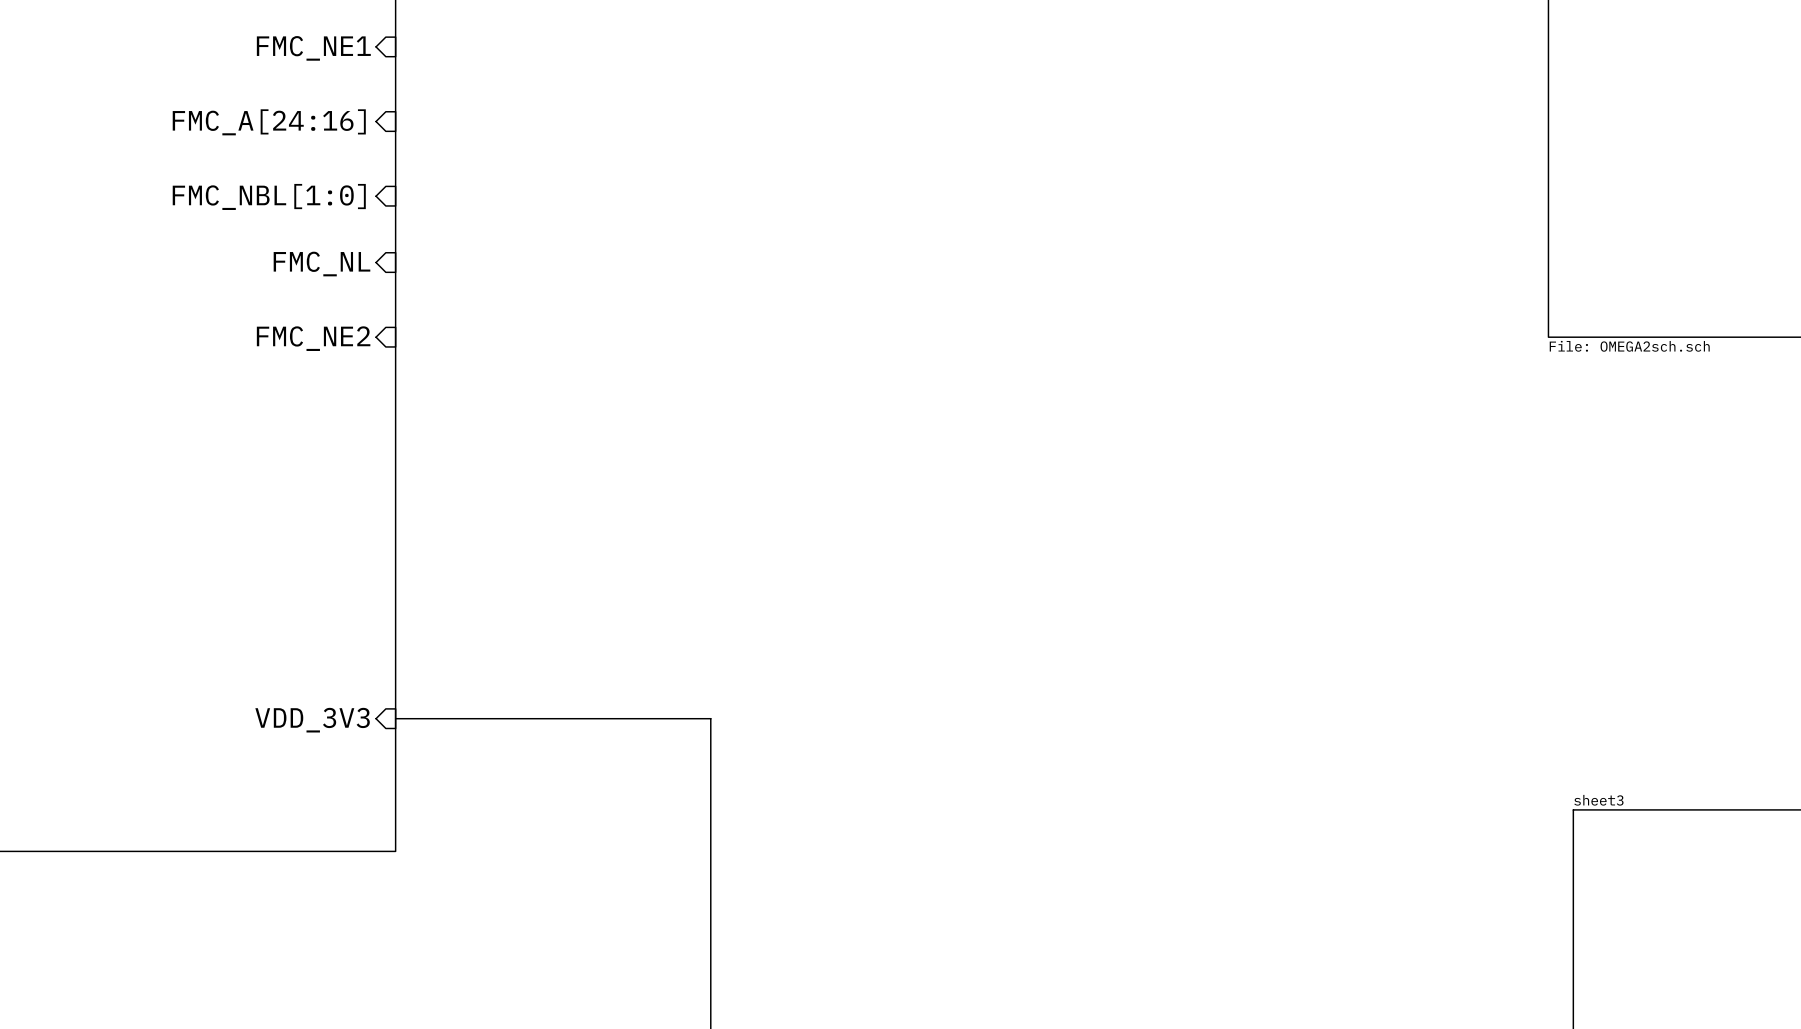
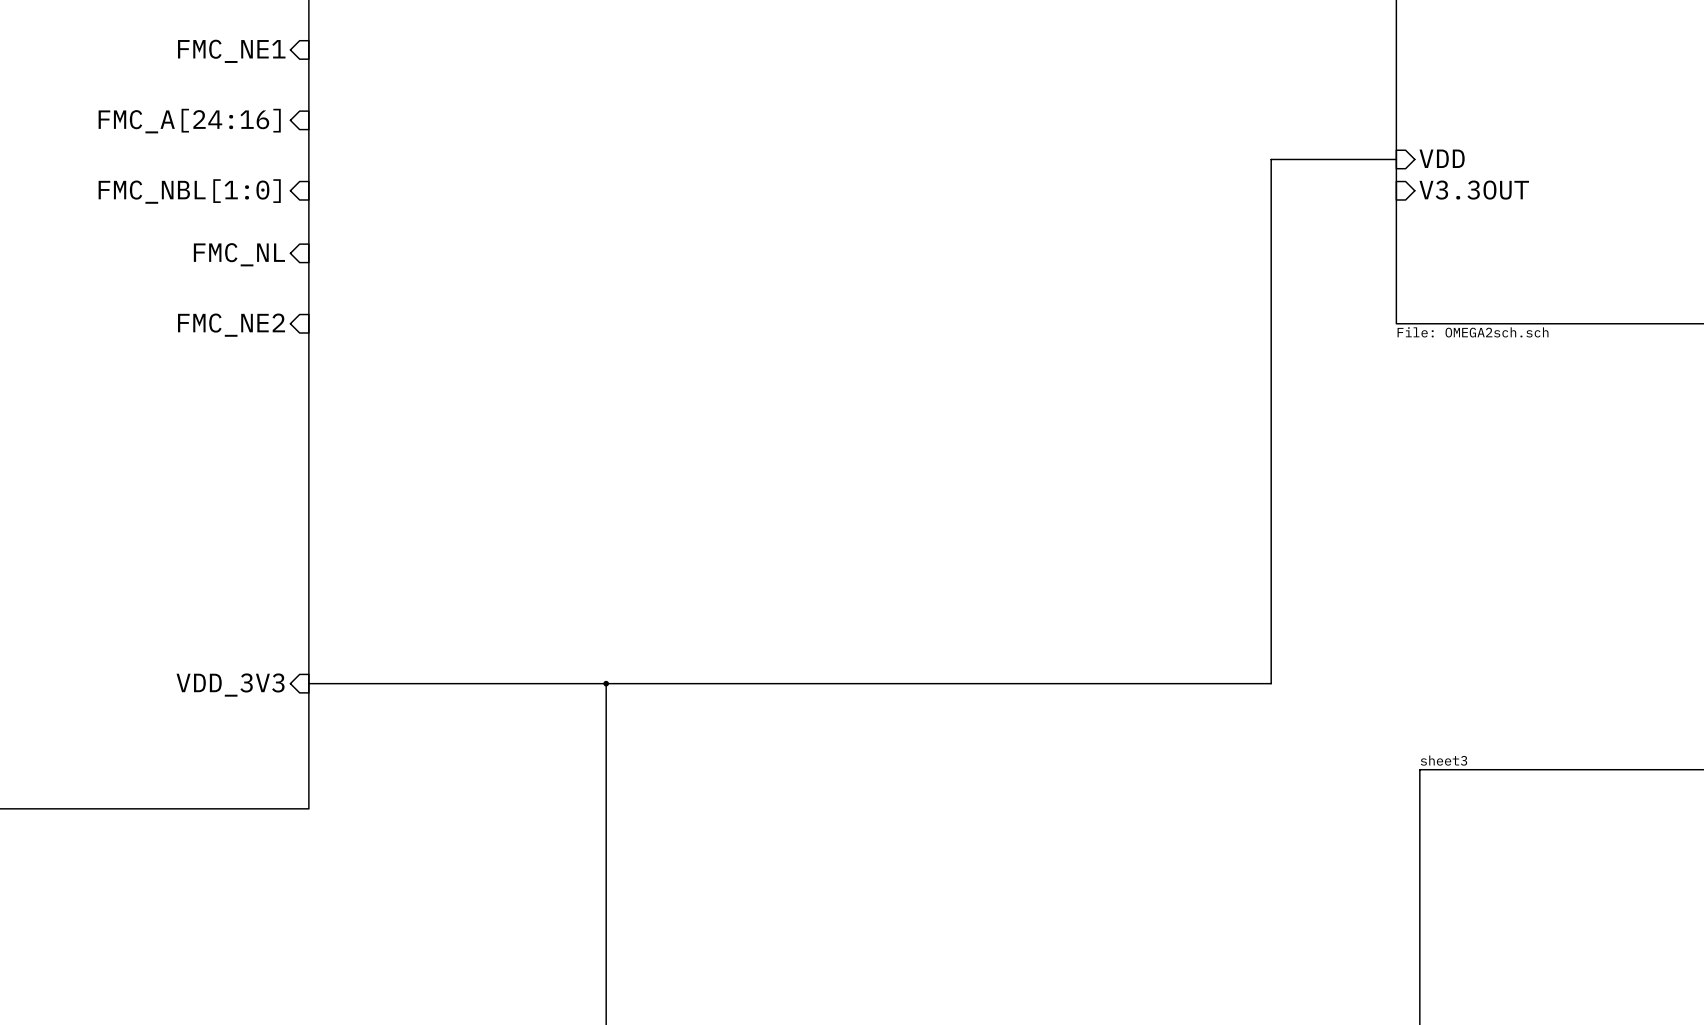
sheet pin: none -> VDD (1442, 158)
wire: none -> (1396, 159) (1271, 159) (1271, 683) (606, 683)
sheet pin: none -> V3.3OUT (1474, 190)
junction: none -> (606, 683)

